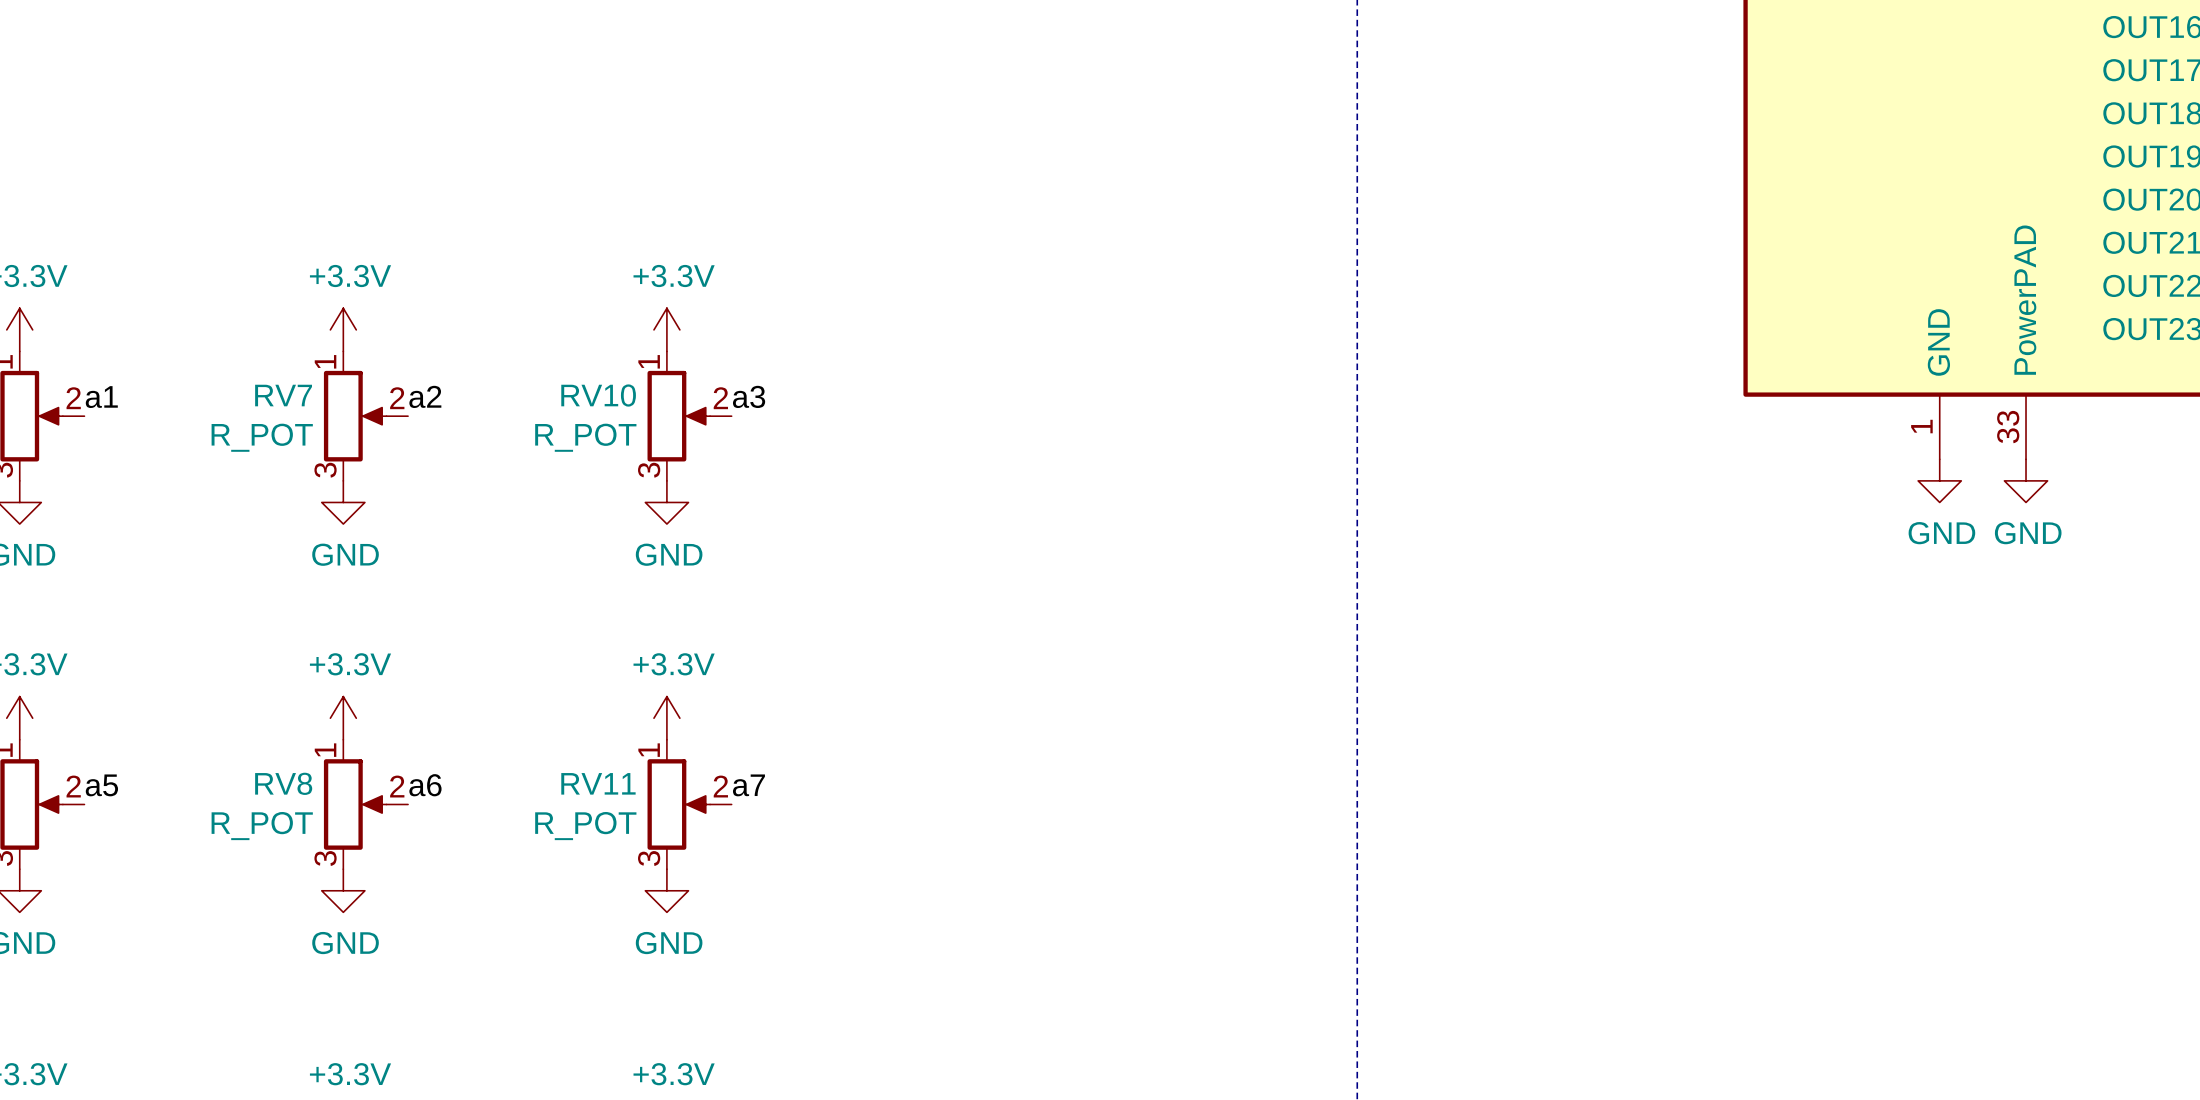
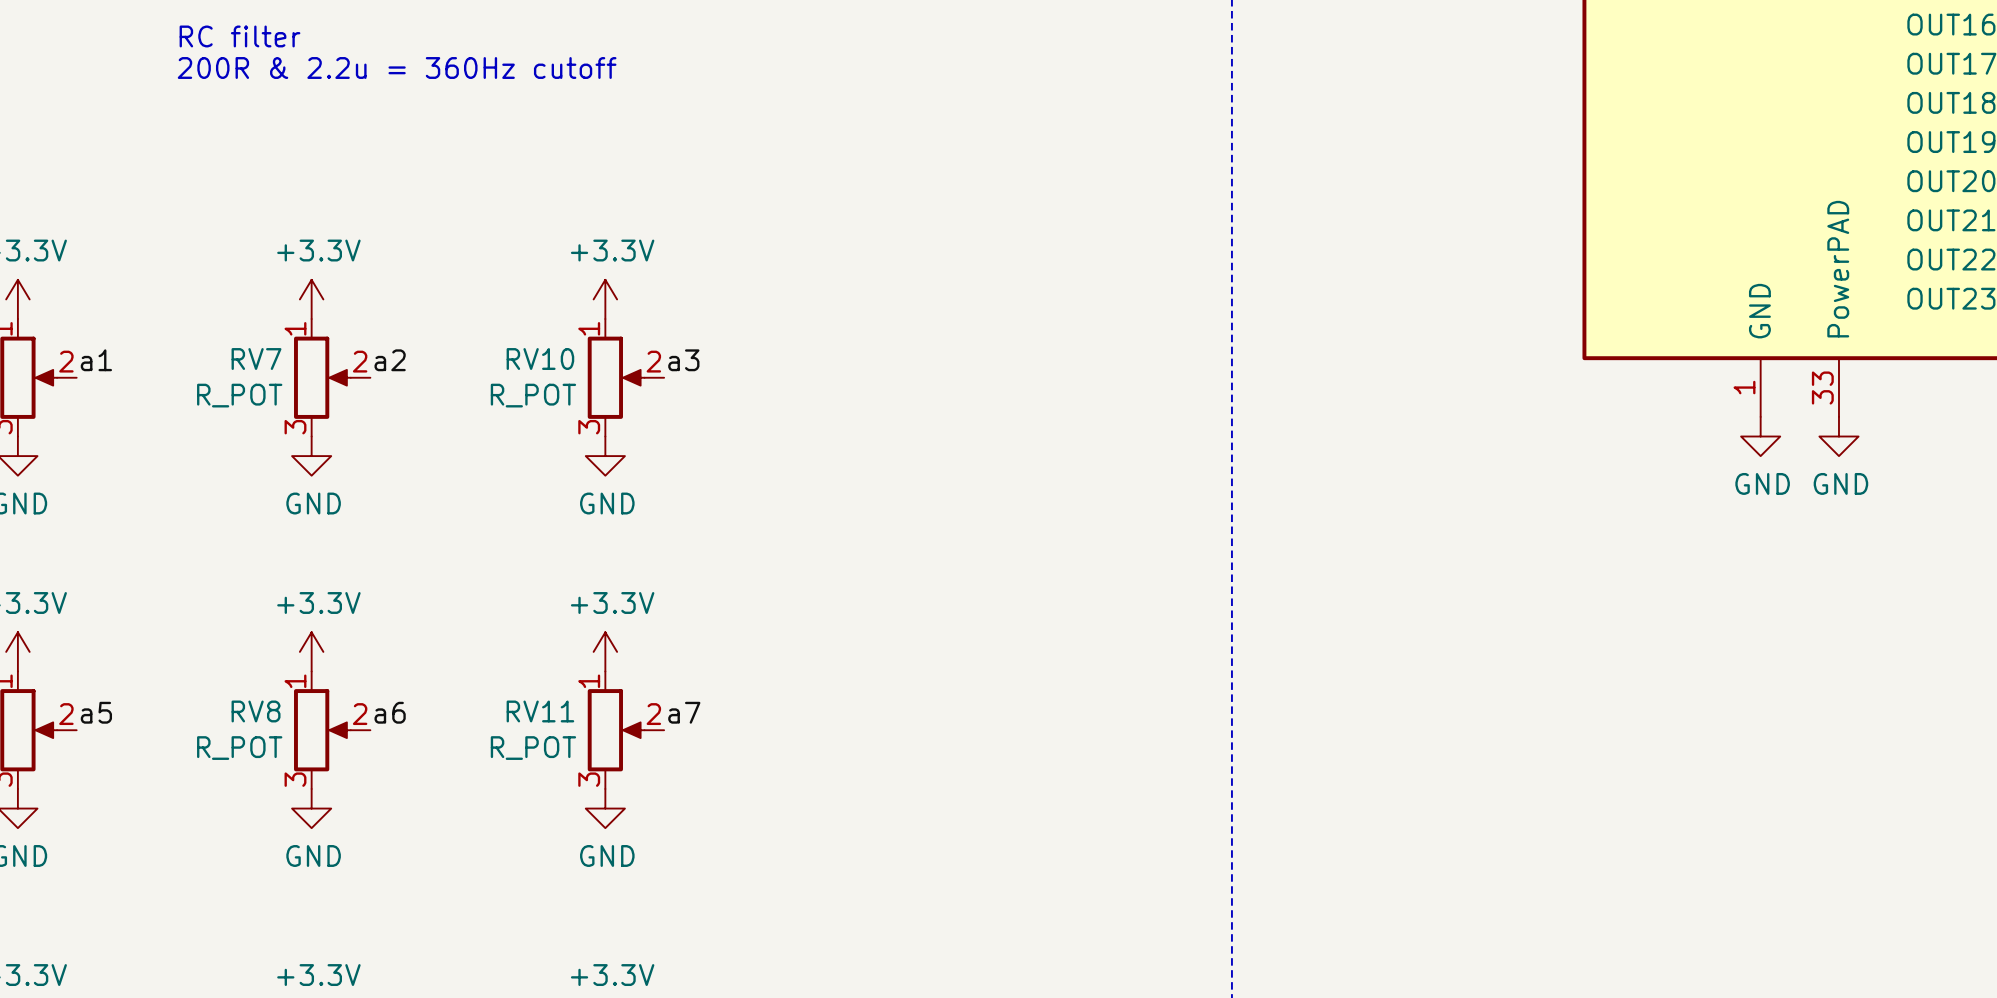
text: none -> RC filter (239, 36)
text: none -> 200R & 2.2u = 360Hz cutoff (397, 67)

